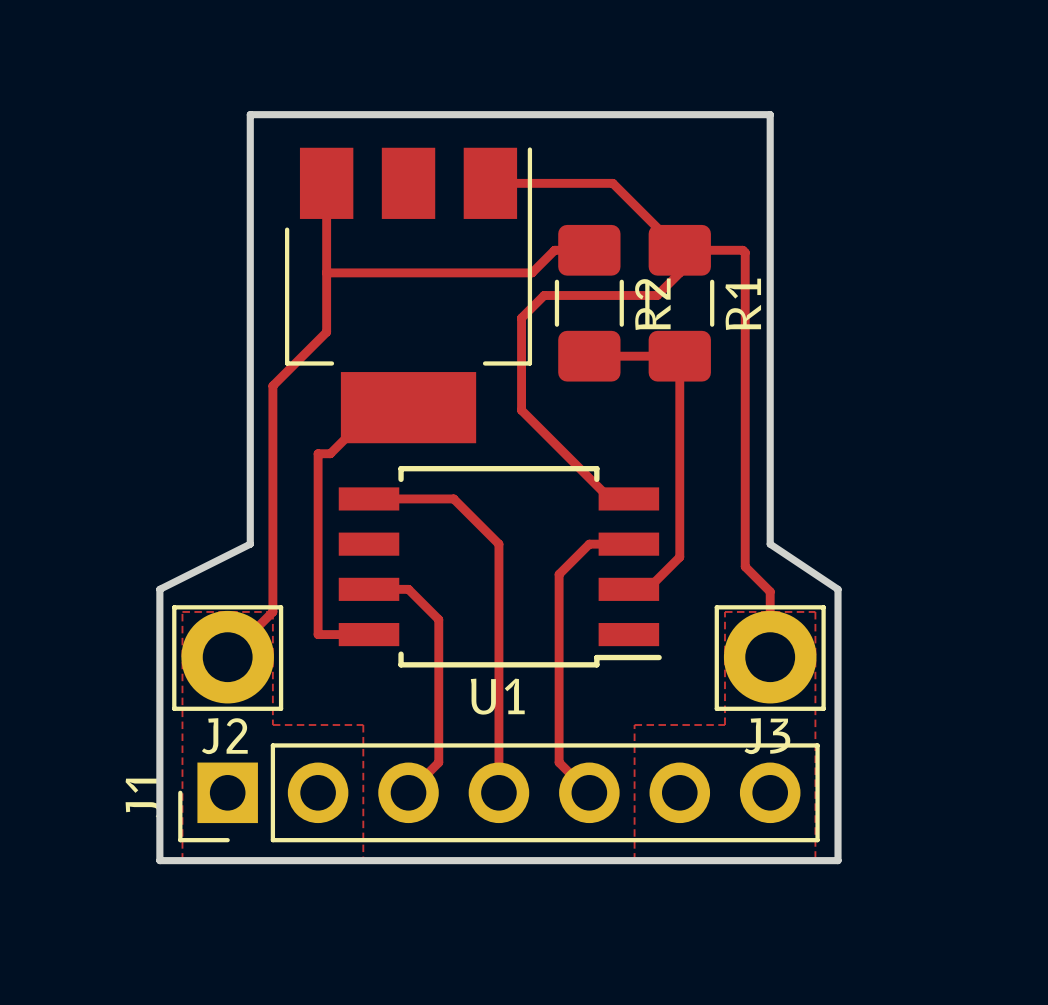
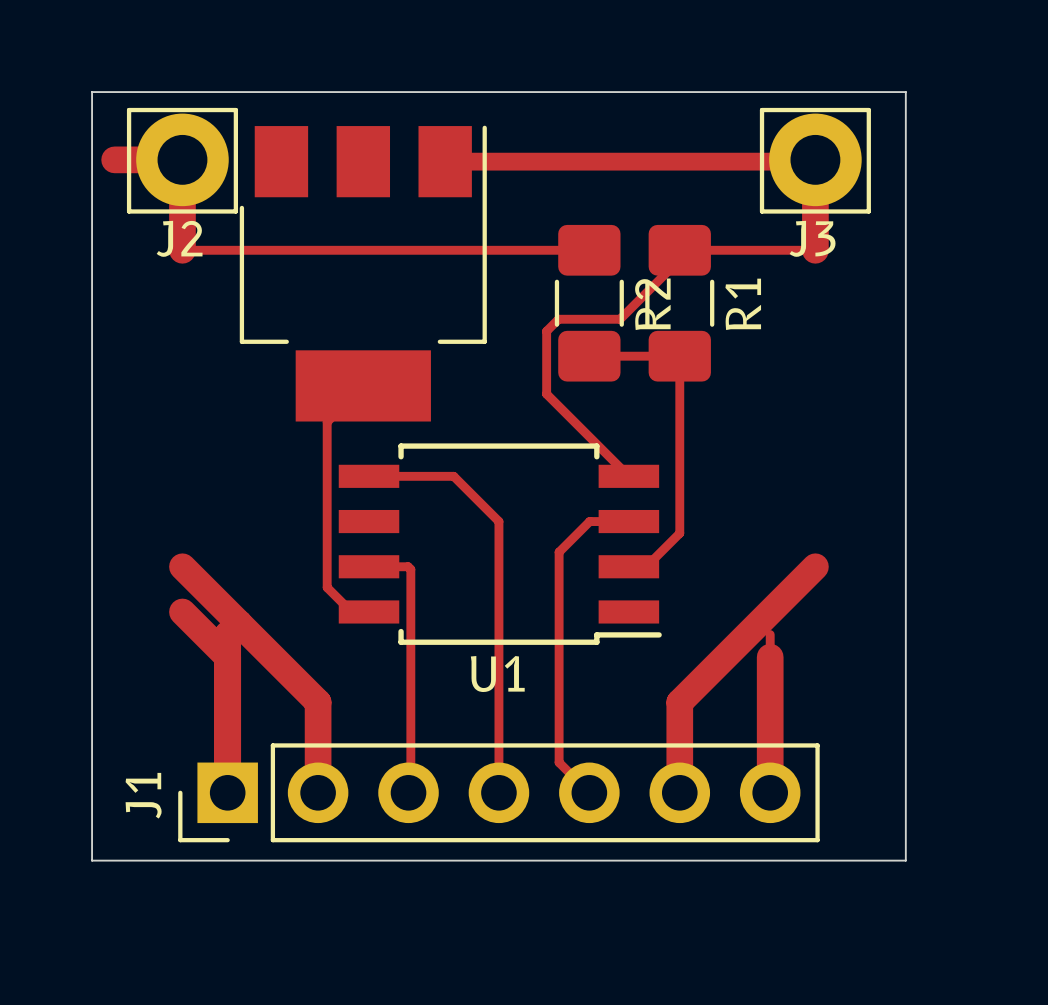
track: none -> (445, 161) (813, 161)
track: (326, 183) (326, 332) (272, 385) (272, 611) (227, 657) -> (182, 611) (227, 657)
track: (490, 183) (612, 183) (679, 250) -> none
track: (554, 250) (532, 272) (326, 272) -> (554, 250) (182, 250) (182, 159) (114, 159)
track: (742, 250) (745, 252) (745, 566) (770, 591) (770, 634) -> (742, 250) (815, 250) (815, 159)
track: (679, 259) (679, 272) (657, 295) (544, 295) (521, 318) (521, 410) (610, 498) (628, 498) -> (679, 259) (620, 319) (558, 319) (546, 331) (546, 394) (628, 476)
part position: (408, 295) -> (363, 273)
track: none -> (363, 385) (327, 422) (327, 587) (351, 611) (369, 611)
track: (408, 407) (376, 407) (330, 453) (318, 453) (318, 634) (369, 634) -> none
track: (369, 498) (453, 498) (498, 544) -> (369, 476) (453, 476) (498, 521) (498, 544)
track: (679, 533) (679, 557) (647, 589) (628, 589) -> (679, 533) (646, 566) (634, 566)
track: (628, 544) (589, 544) (559, 574) -> (628, 521) (589, 521) (559, 552) (559, 574)
track: none -> (182, 566) (318, 702) (318, 792)
U1 position: (500, 566) -> (500, 544)
track: none -> (815, 566) (679, 702) (679, 792)
track: (369, 589) (408, 589) (438, 619) (438, 762) (410, 790) -> (369, 566) (408, 566) (410, 569) (410, 790)
zone outline: (182, 611) (272, 611) (272, 724) (363, 724) (363, 860) (182, 860) (182, 611) -> none
zone outline: (724, 611) (815, 611) (815, 860) (634, 860) (634, 724) (724, 724) (724, 611) -> none
track: none -> (238, 623) (227, 634) (227, 792)
track: none -> (770, 657) (770, 792)
J2 position: (227, 658) -> (182, 160)
J3 position: (770, 658) -> (815, 160)
board edge: (159, 860) (159, 589) (250, 544) (250, 114) (770, 114) (770, 544) (838, 589) (838, 860) -> (159, 860) (92, 860) (92, 92) (905, 92) (905, 860) (838, 860)
board edge width: thick (159, 860) (838, 860) -> thin (159, 860) (838, 860)

